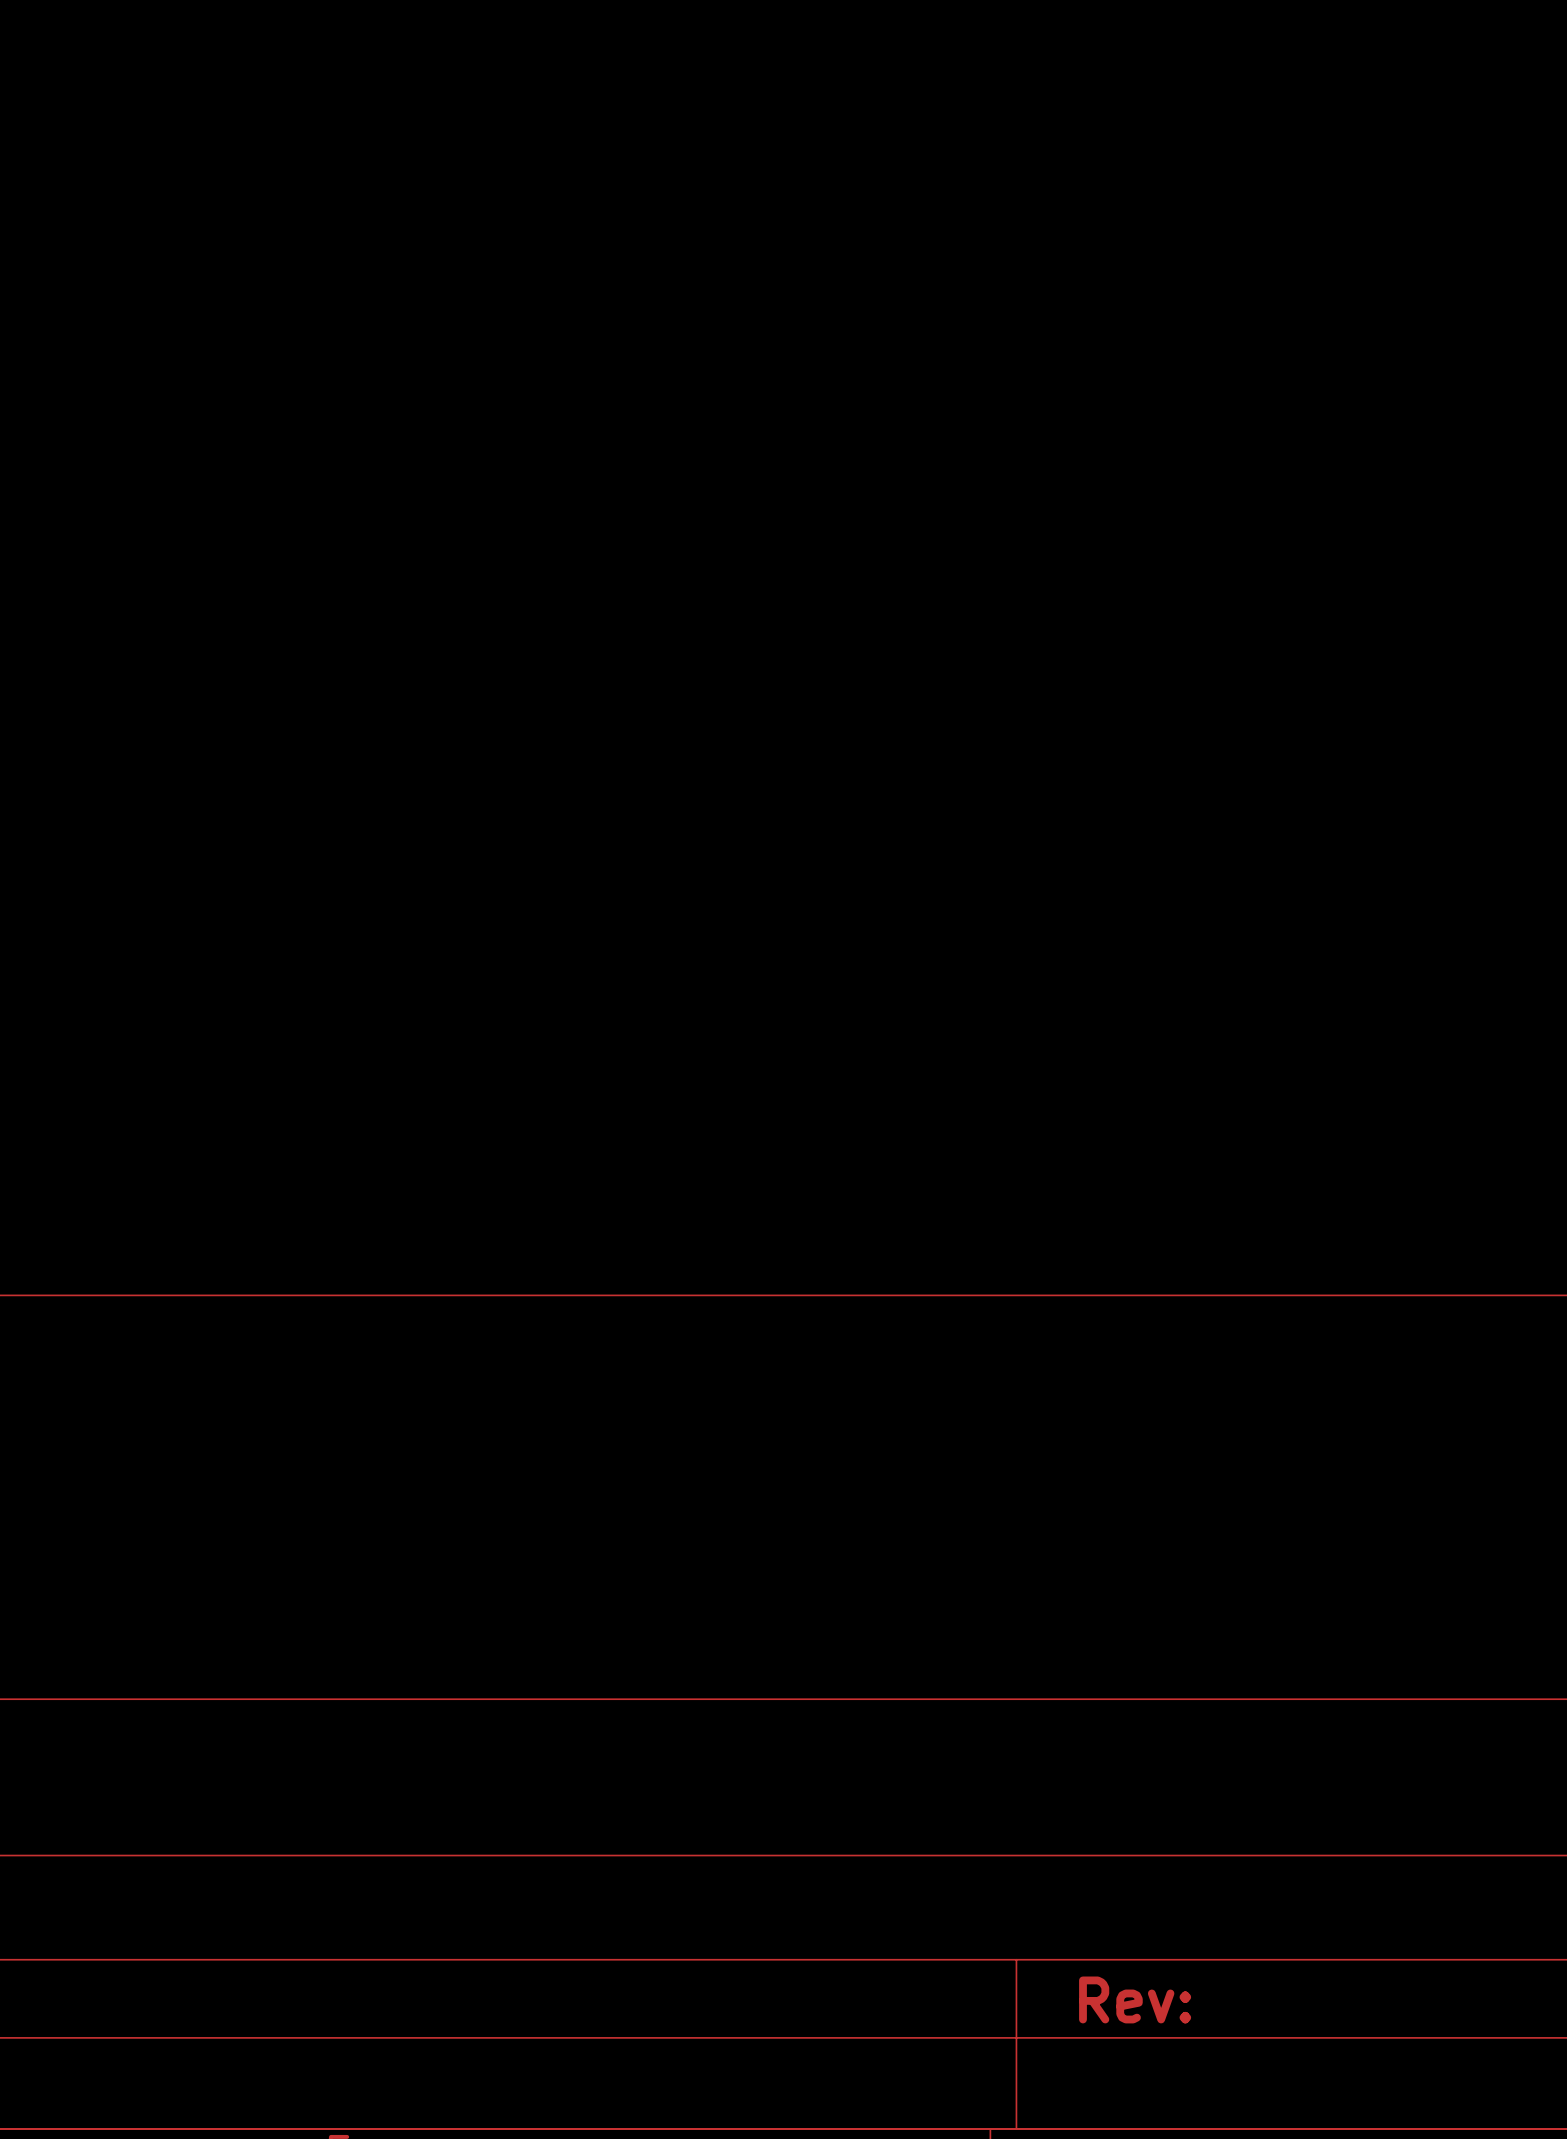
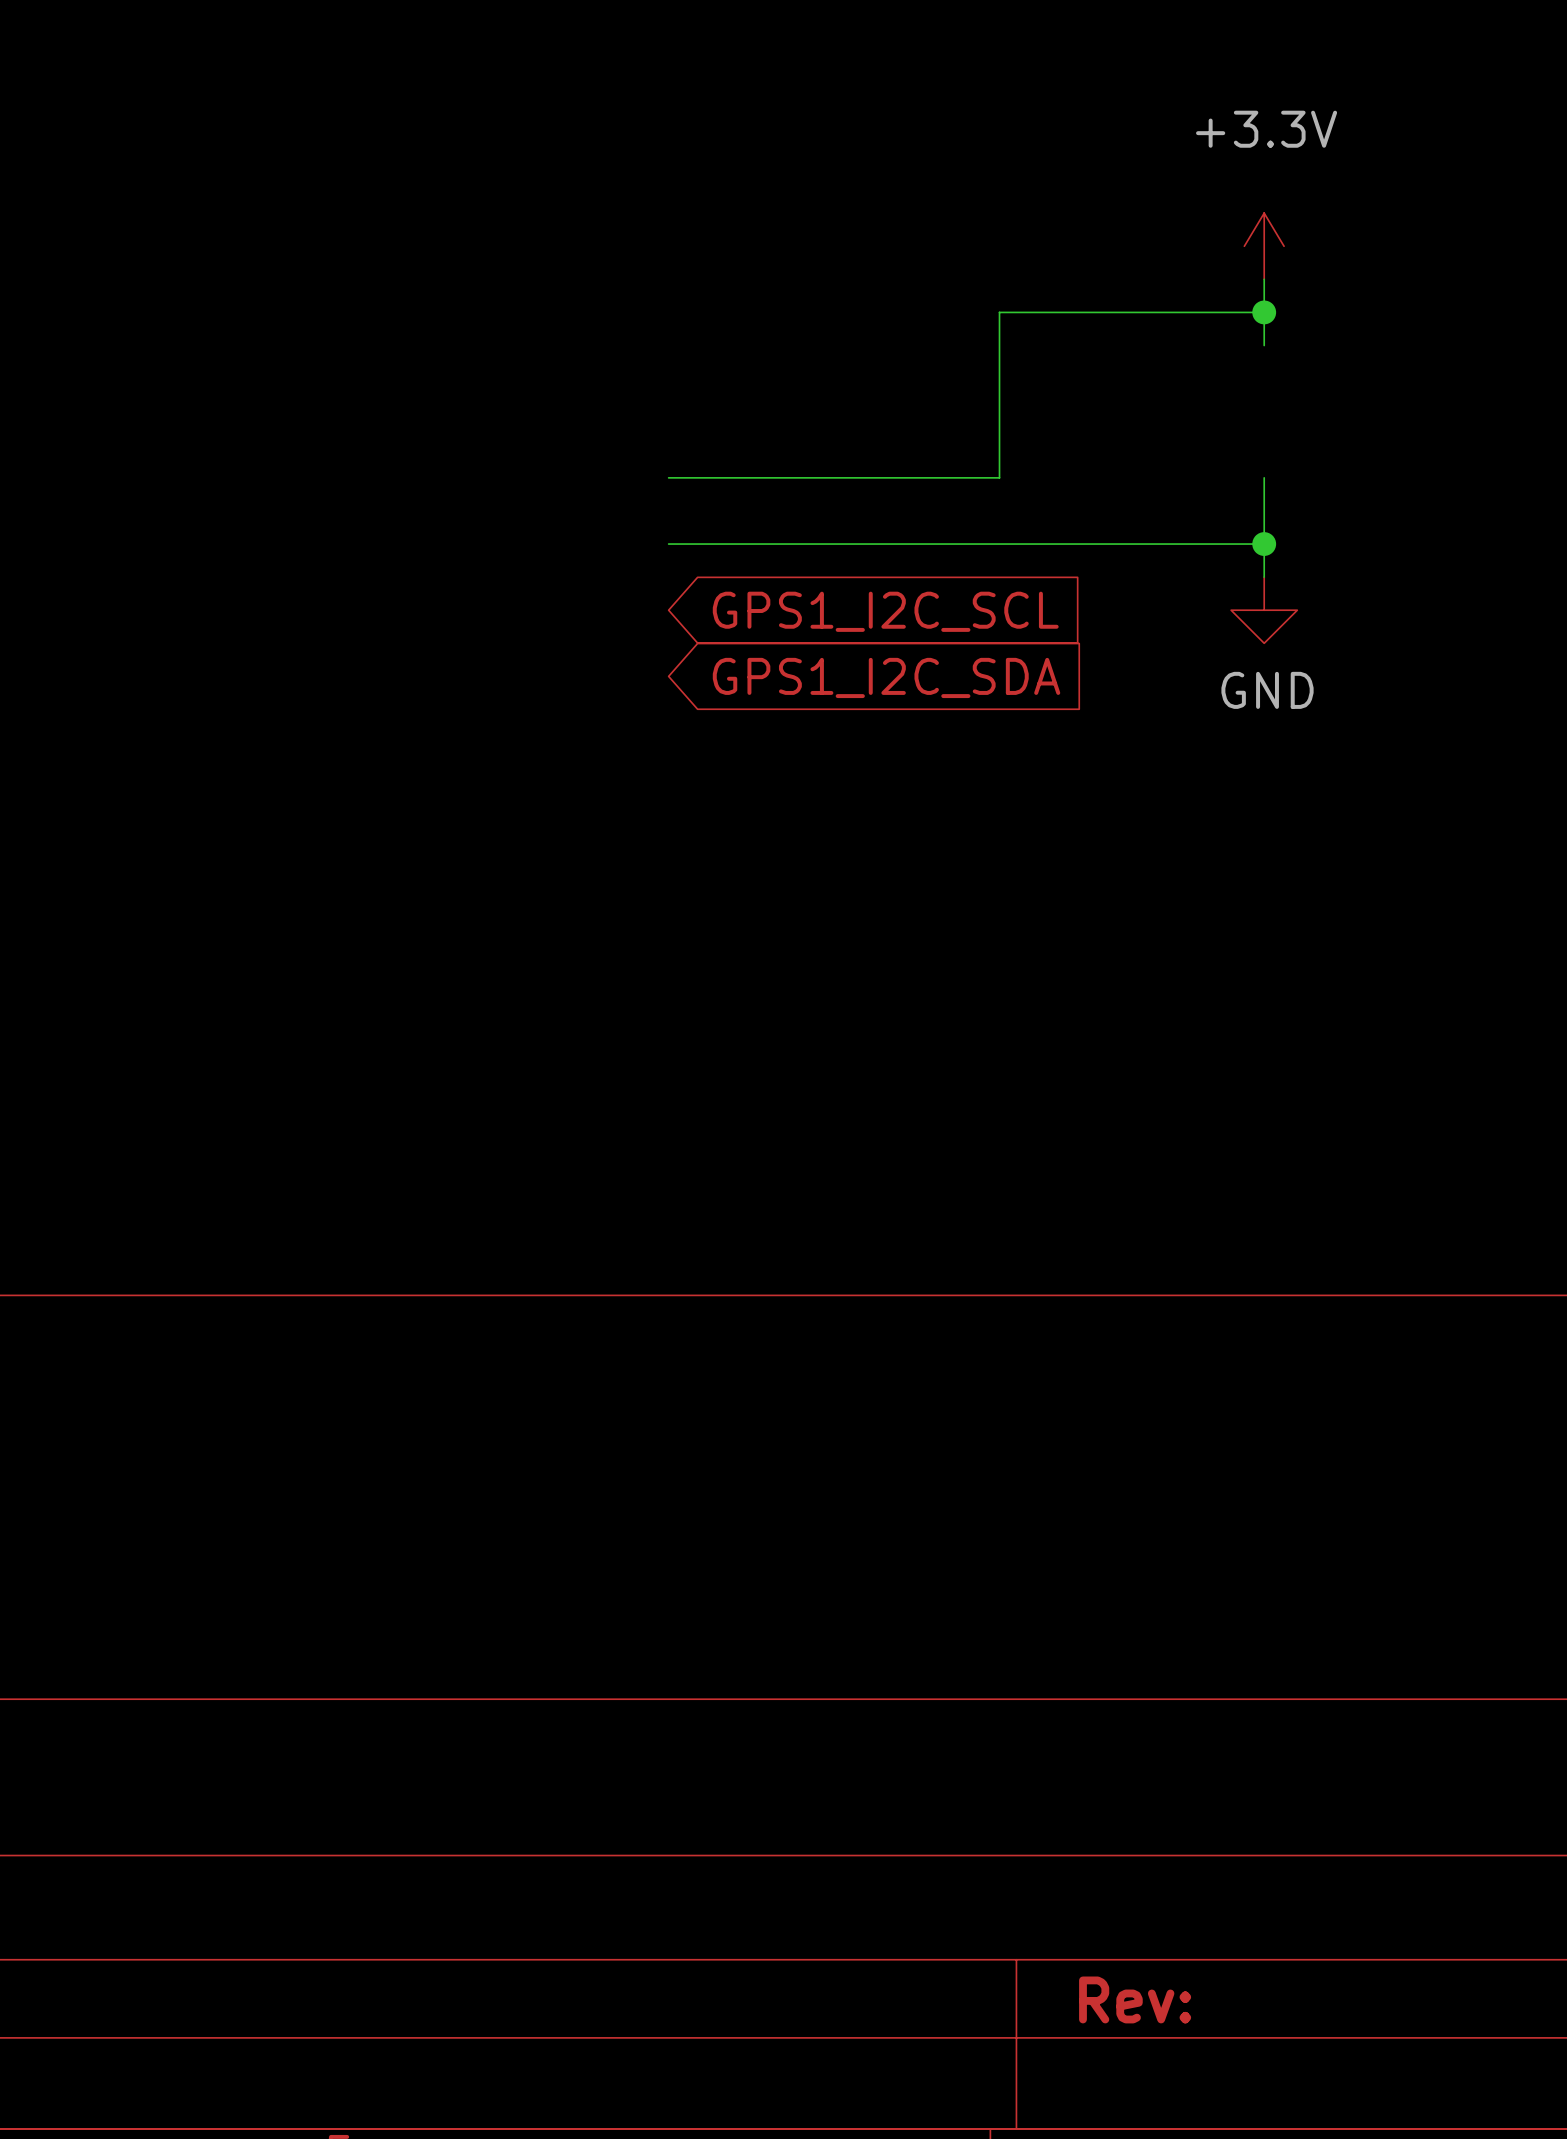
power symbol: none -> +3.3V (1264, 246)
wire: none -> (1264, 279) (1264, 345)
wire: none -> (1264, 312) (999, 312) (999, 477) (668, 477)
junction: none -> (1264, 312)
wire: none -> (1264, 477) (1264, 577)
wire: none -> (668, 544) (1264, 544)
junction: none -> (1264, 544)
power symbol: none -> GND (1264, 610)
global label: none -> GPS1_I2C_SCL (885, 611)
global label: none -> GPS1_I2C_SDA (886, 677)

